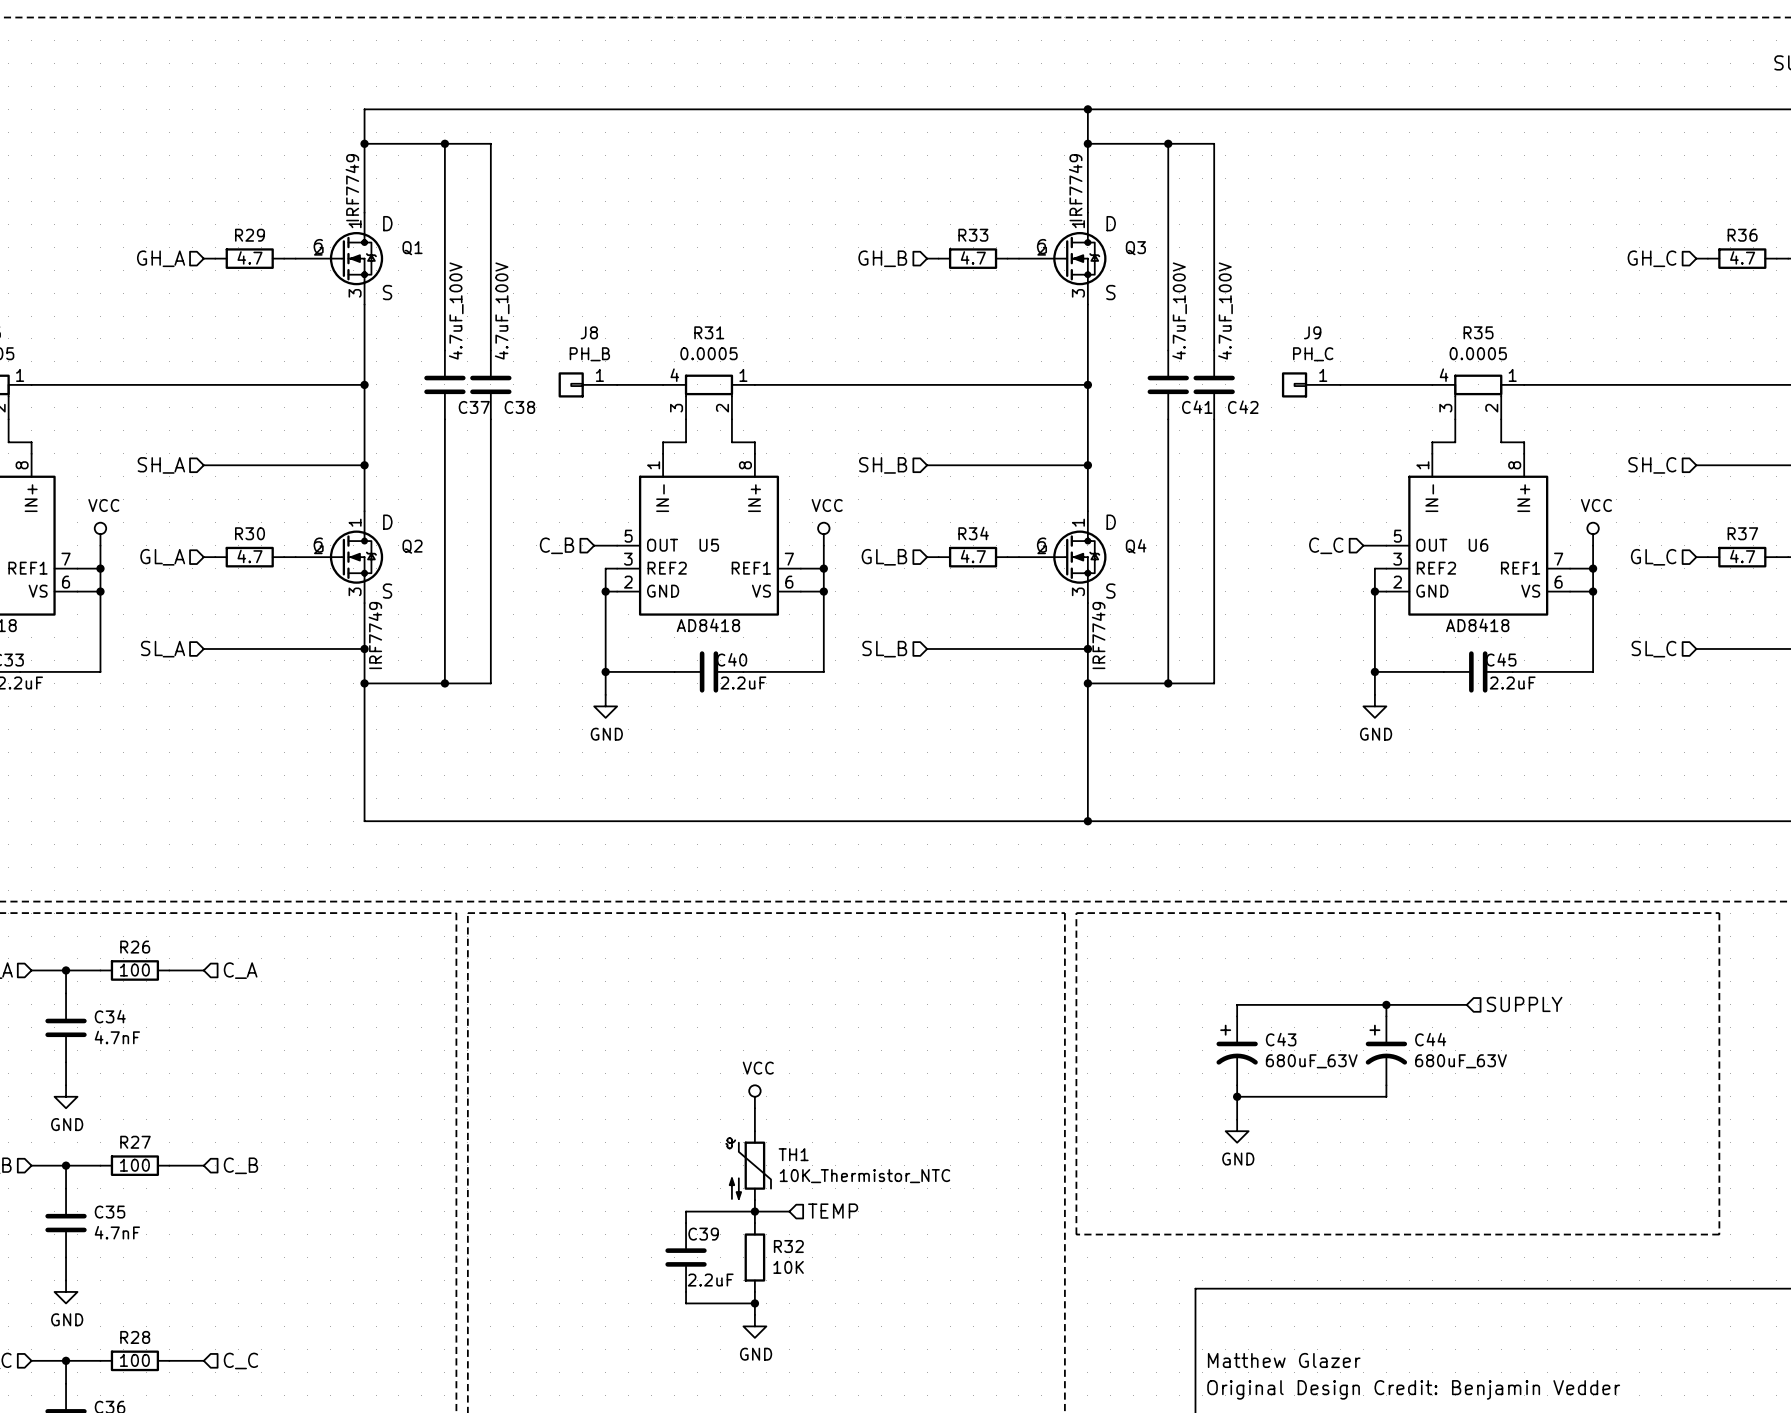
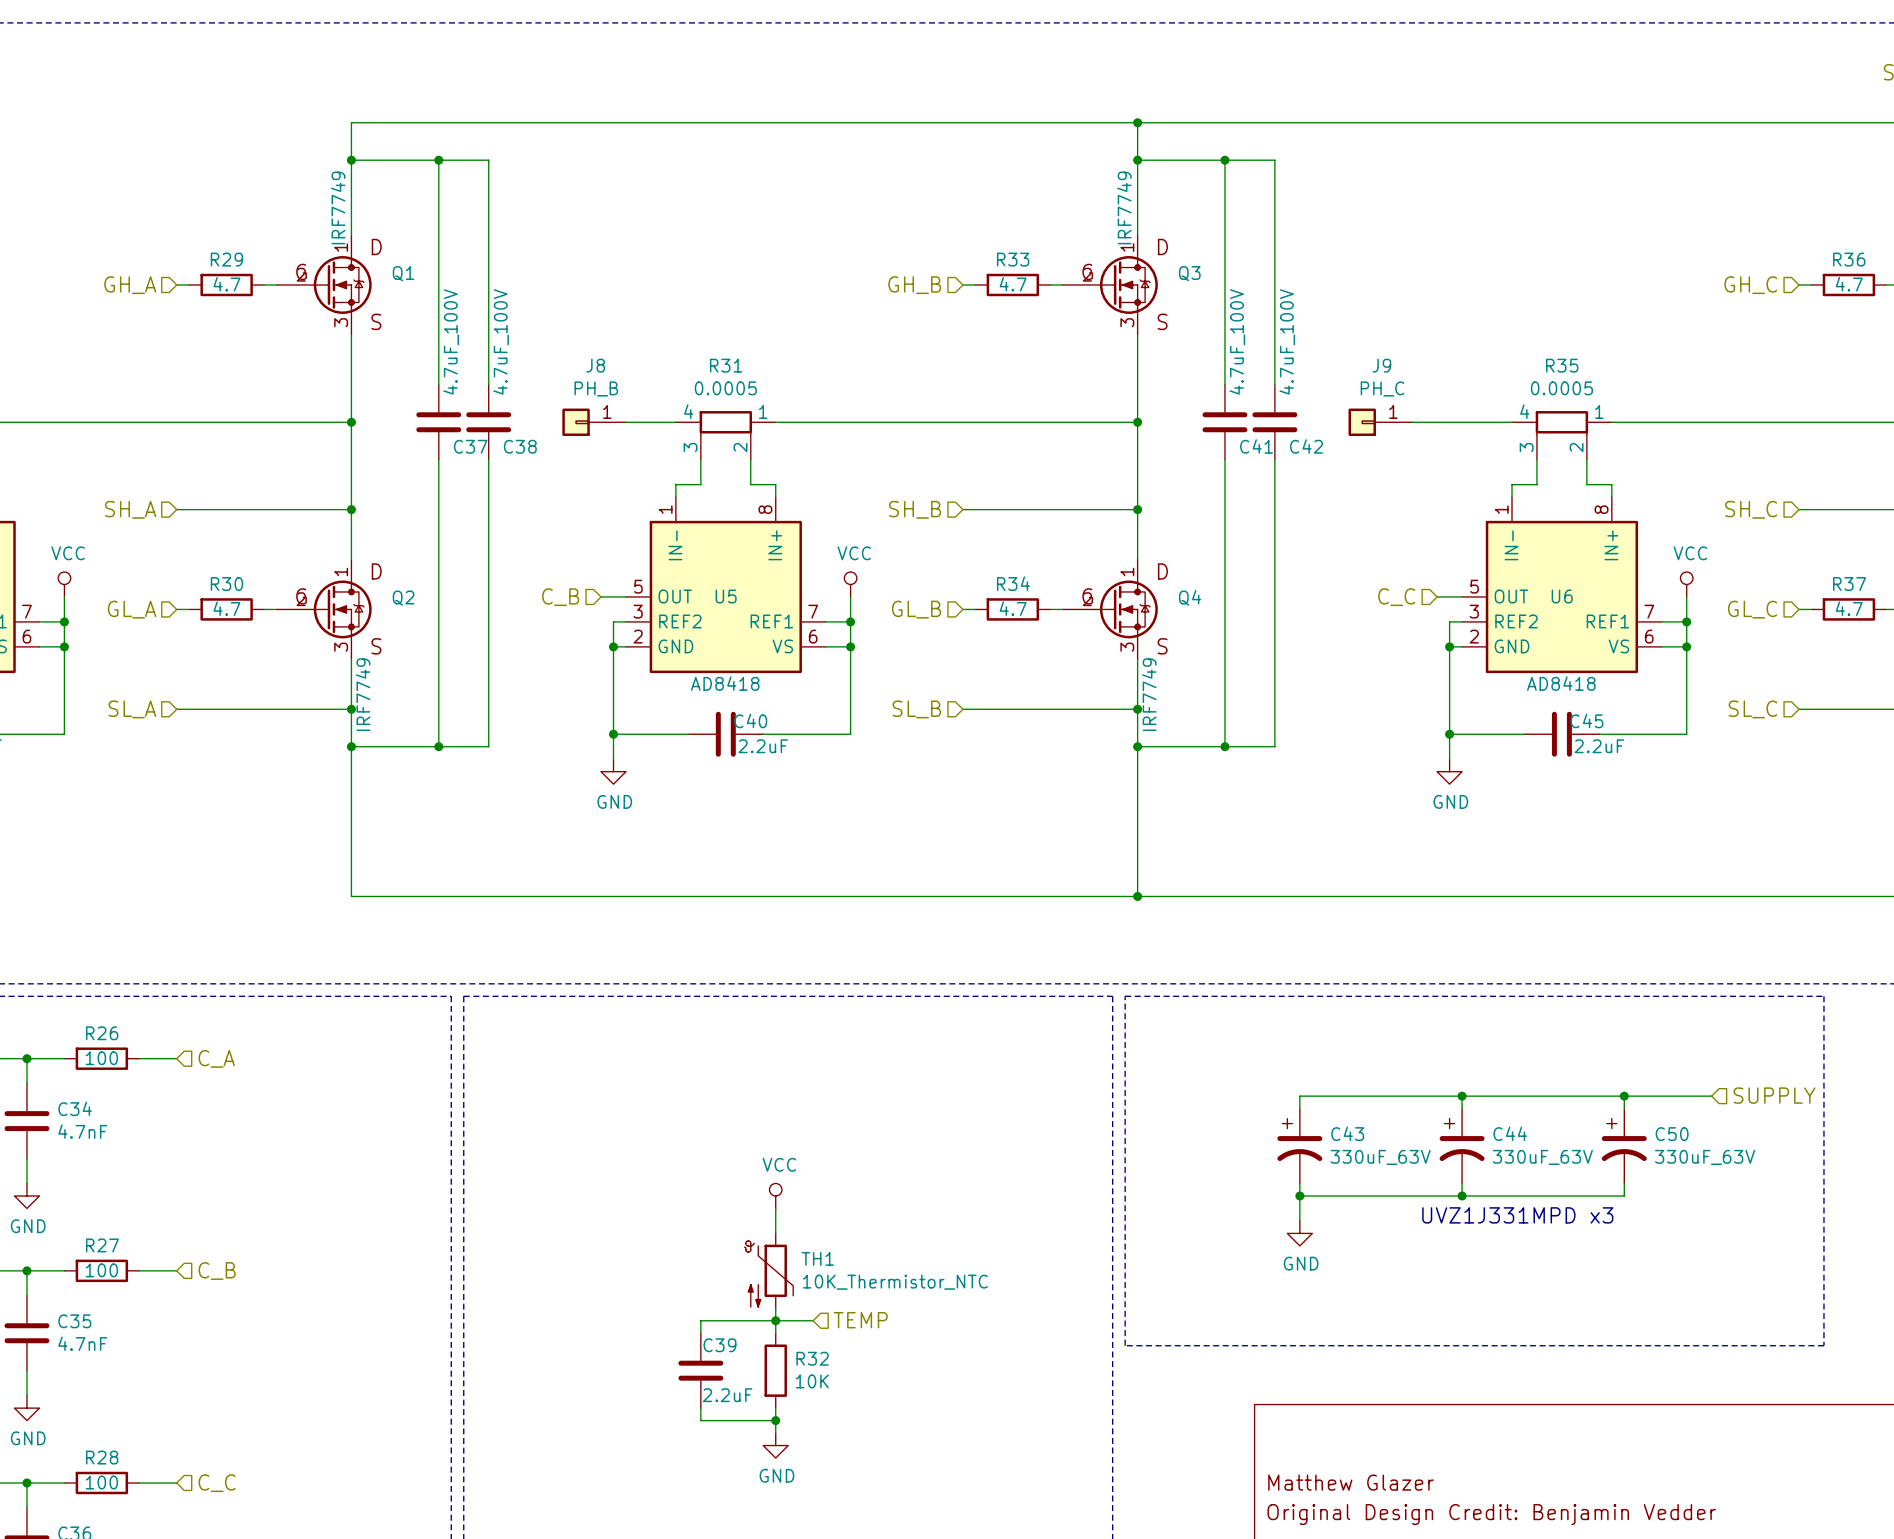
wire: none -> (1549, 1096) (1711, 1096)
hierarchical label position: SUPPLY (1524, 1004) -> SUPPLY (1774, 1095)
wire: none -> (1624, 1096) (1624, 1108)
junction: none -> (1624, 1096)
C50: none -> 330uF_63V (1624, 1146)
C43 value: 680uF_63V (1311, 1061) -> 330uF_63V (1380, 1157)
C44 value: 680uF_63V (1461, 1061) -> 330uF_63V (1542, 1157)
wire: none -> (1624, 1183) (1624, 1195) (1462, 1195)
junction: none -> (1462, 1195)
text: none -> UVZ1J331MPD x3 (1517, 1215)

